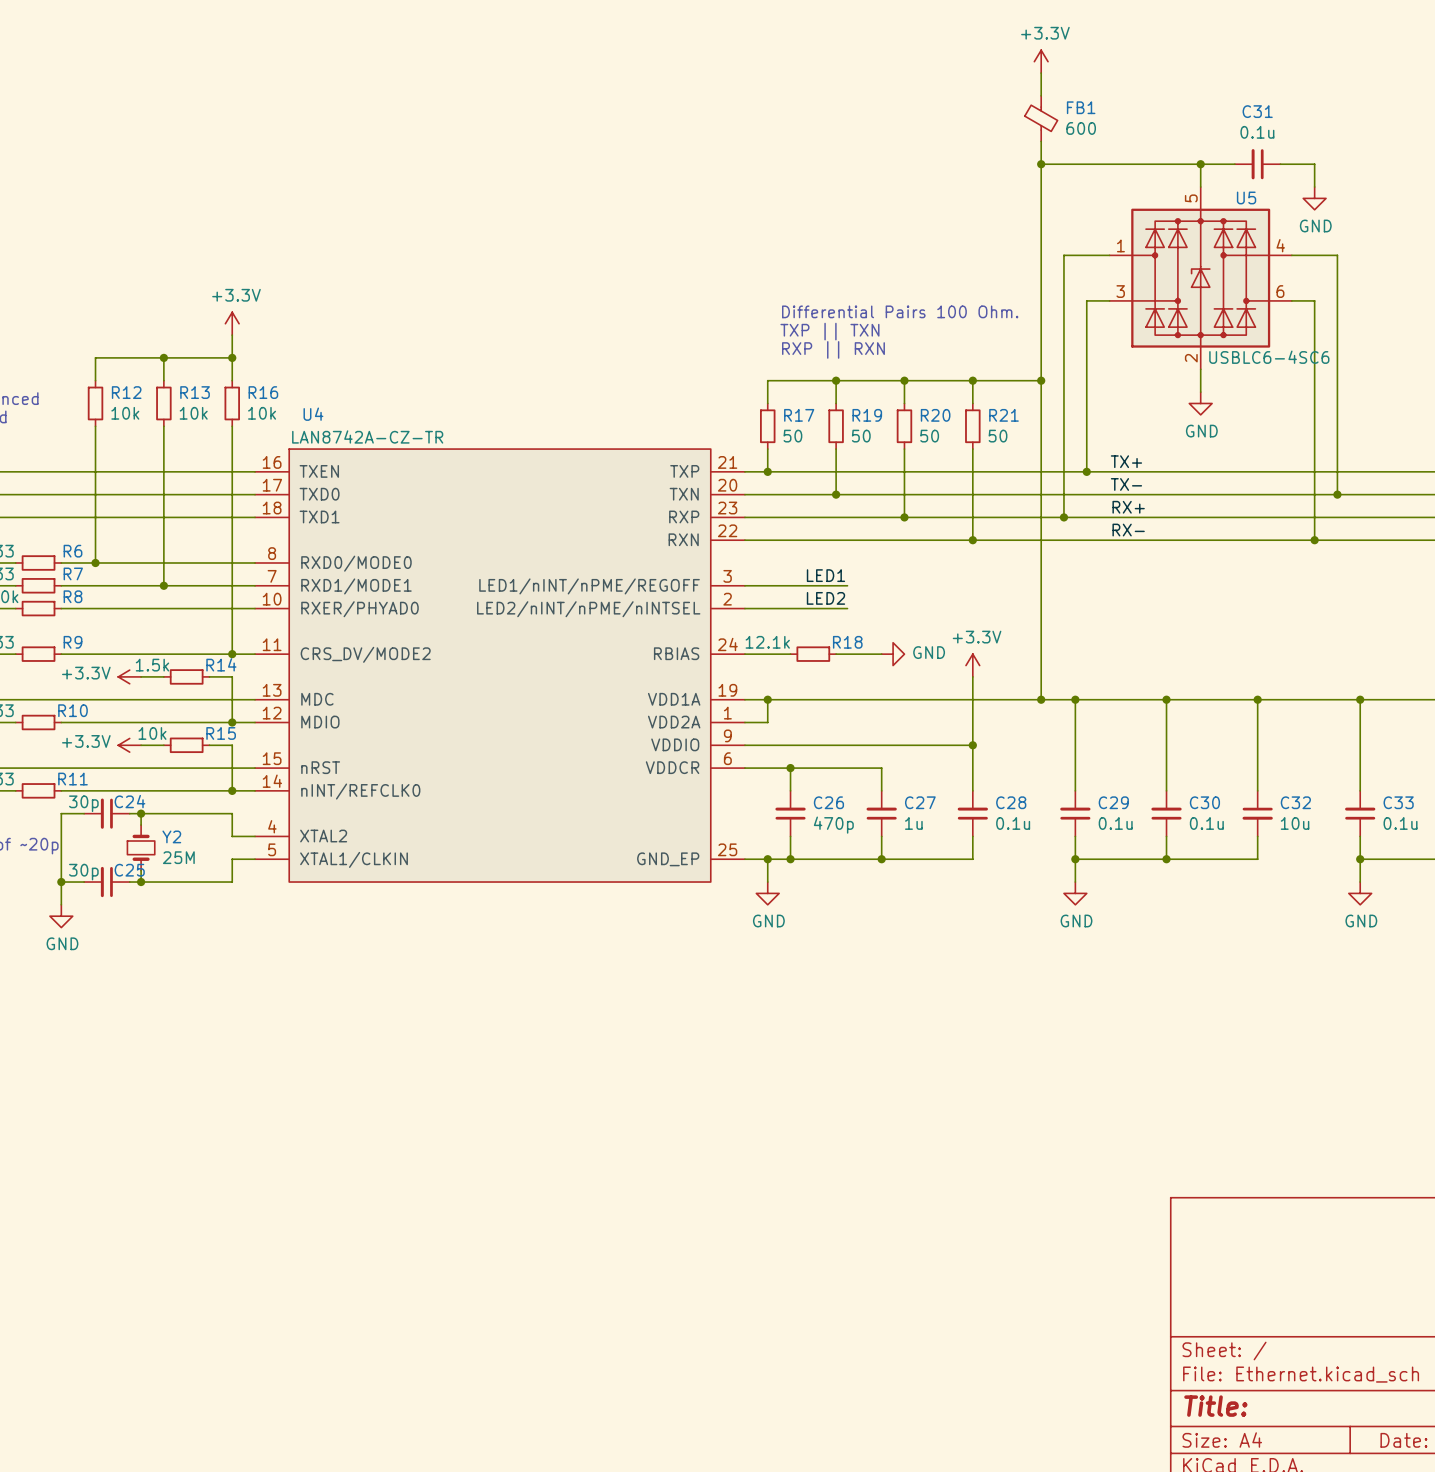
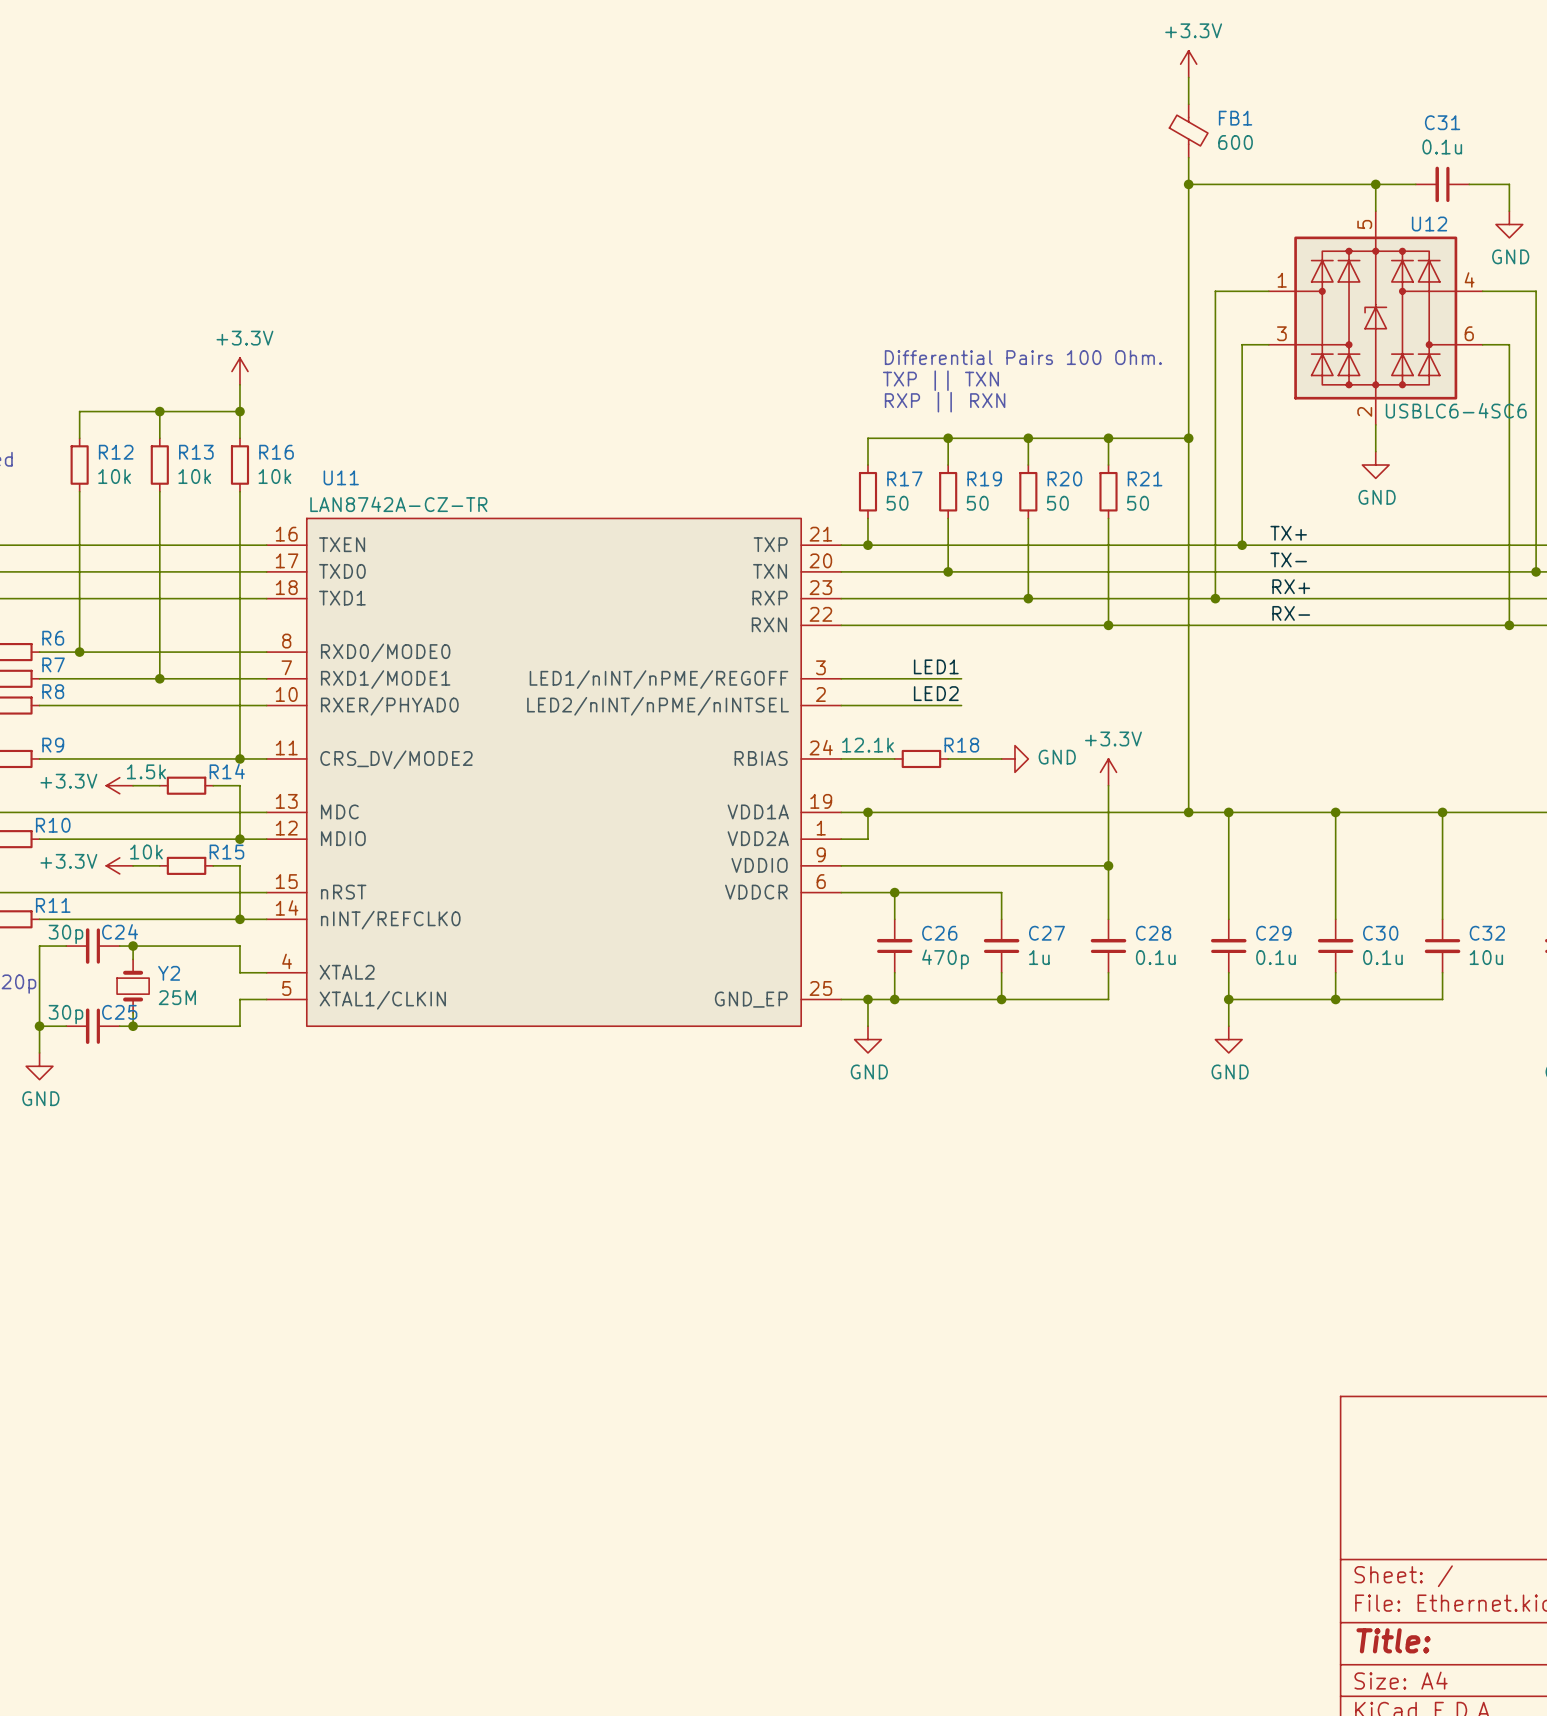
U5 name: U5 (1246, 197) -> U12 (1429, 224)
U4 name: U4 (313, 414) -> U11 (341, 477)

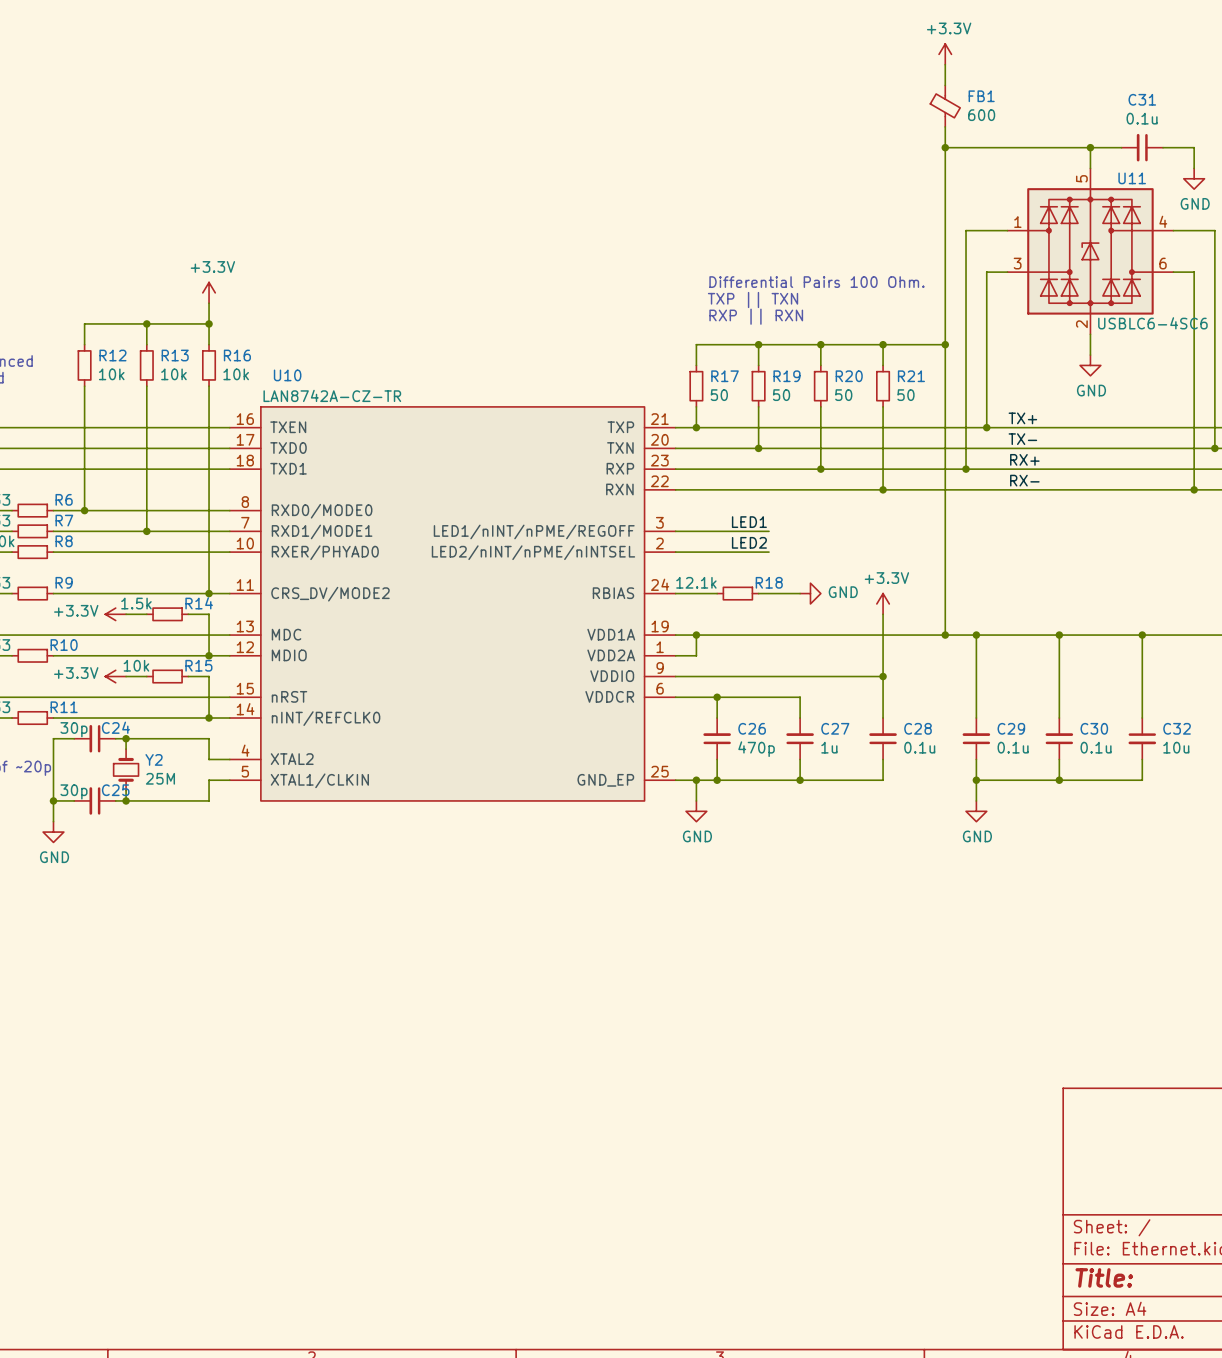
U12 name: U12 (1429, 224) -> U11 (1132, 178)
U11 name: U11 (341, 477) -> U10 (287, 375)

